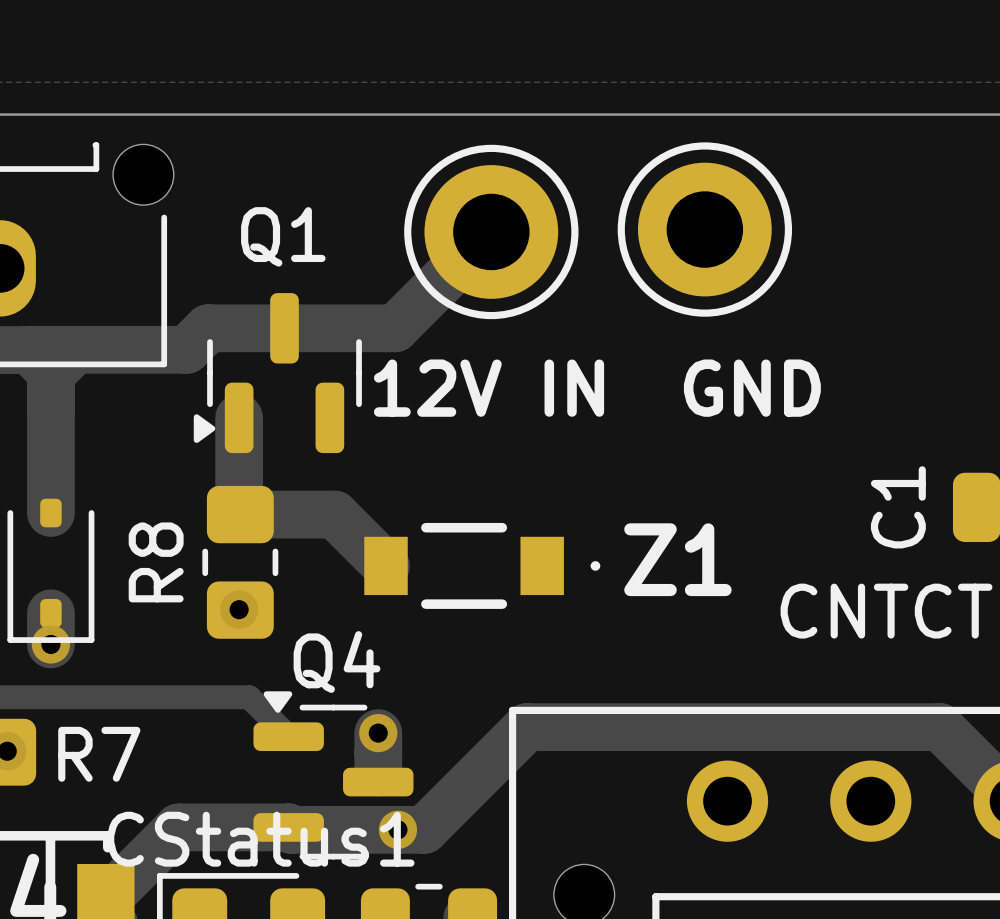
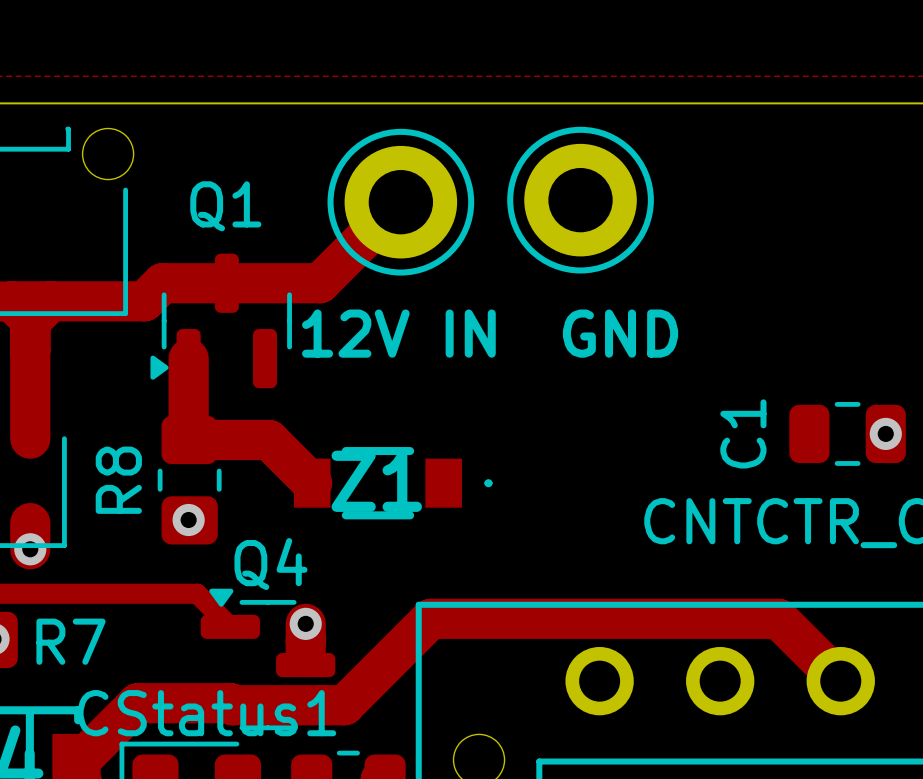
Z1 name position: Z1 (677, 559) -> Z1 (376, 481)
via: (397, 829) -> none

